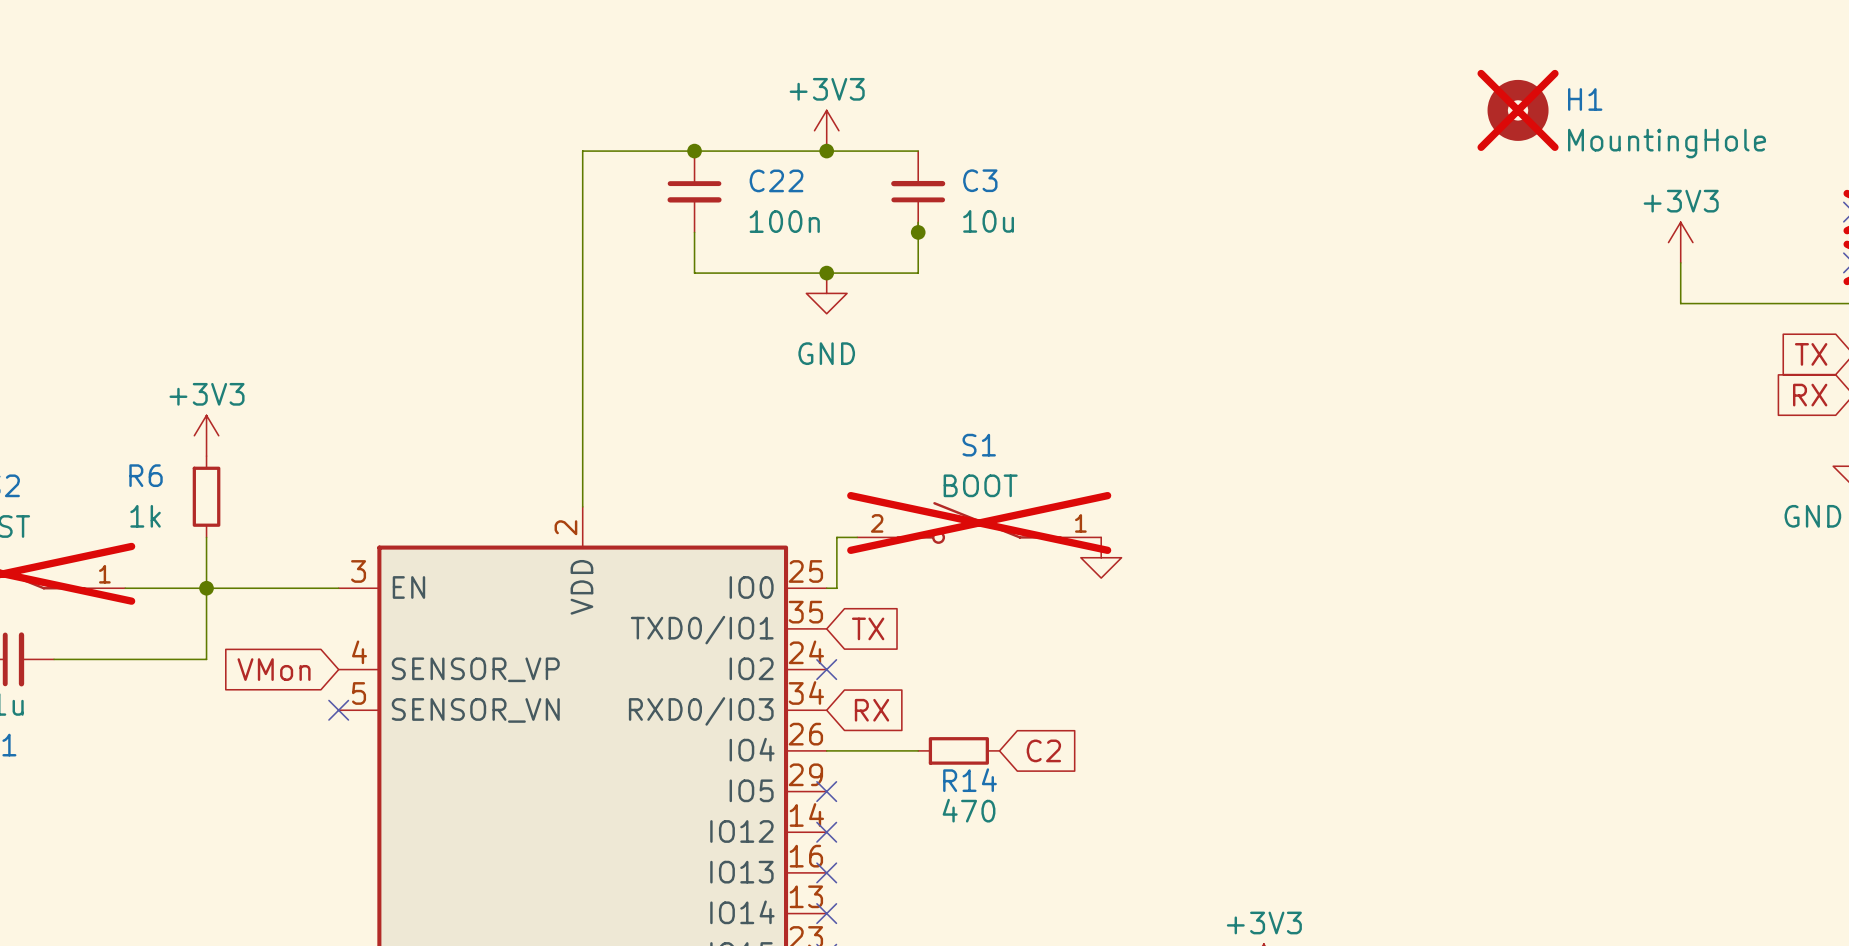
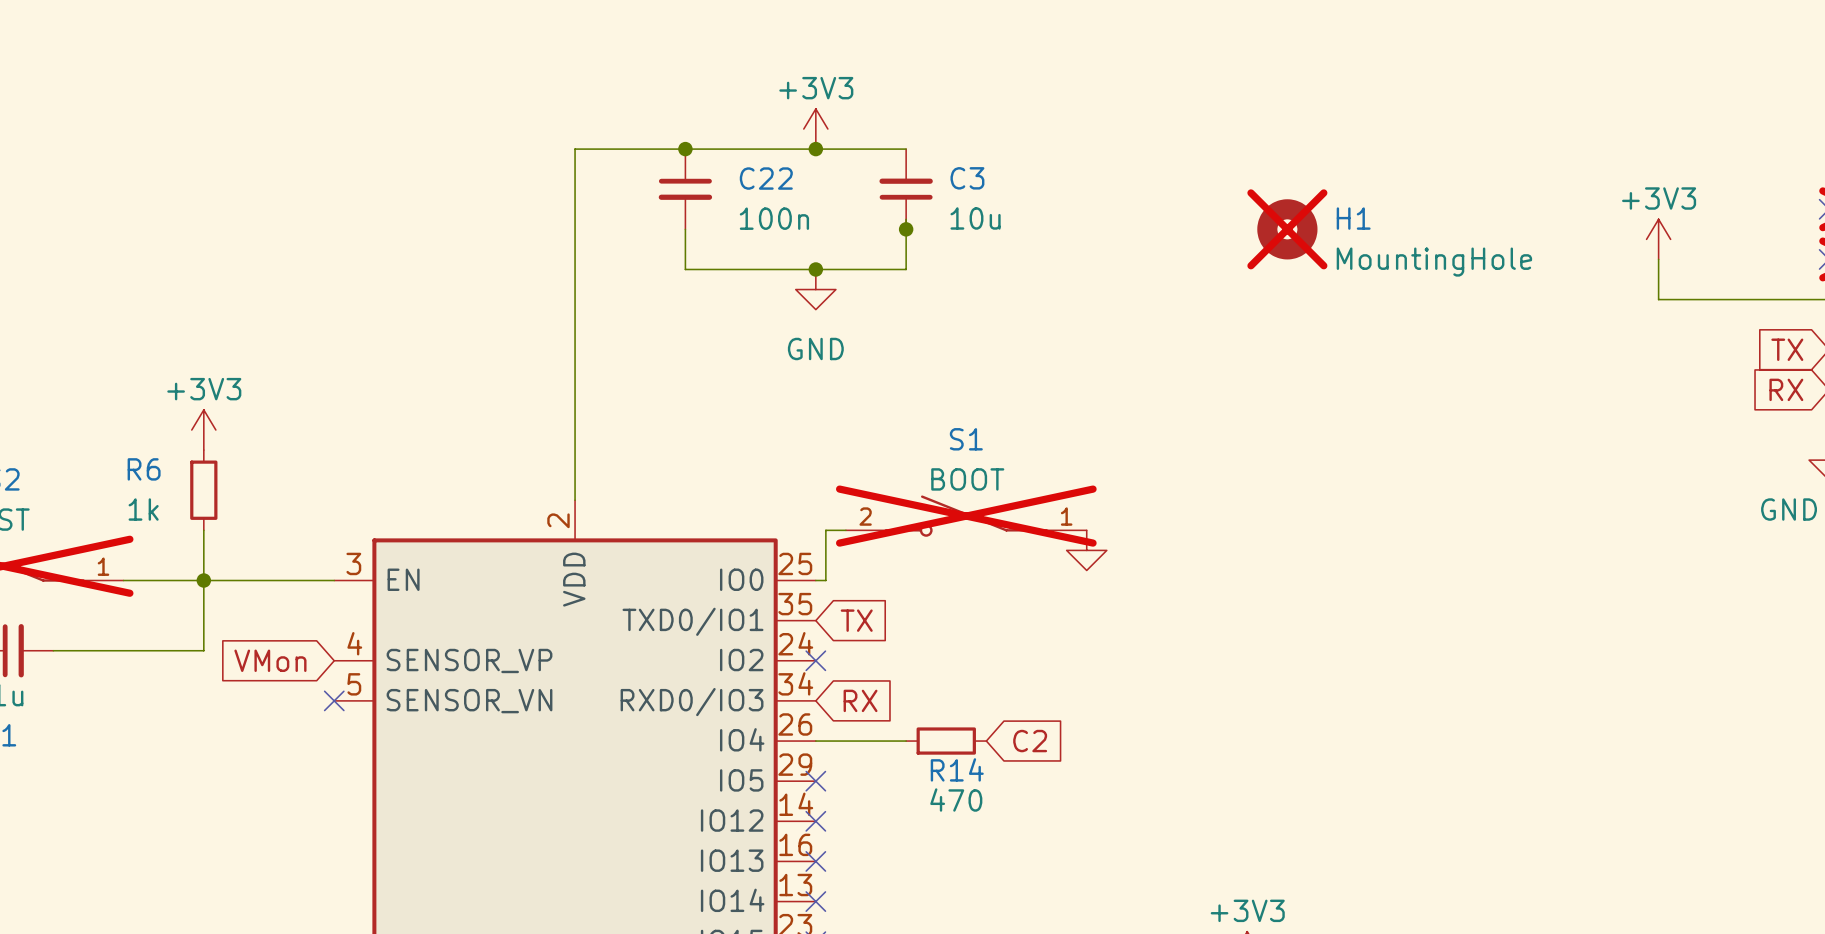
H1 position: (1518, 110) -> (1287, 229)

